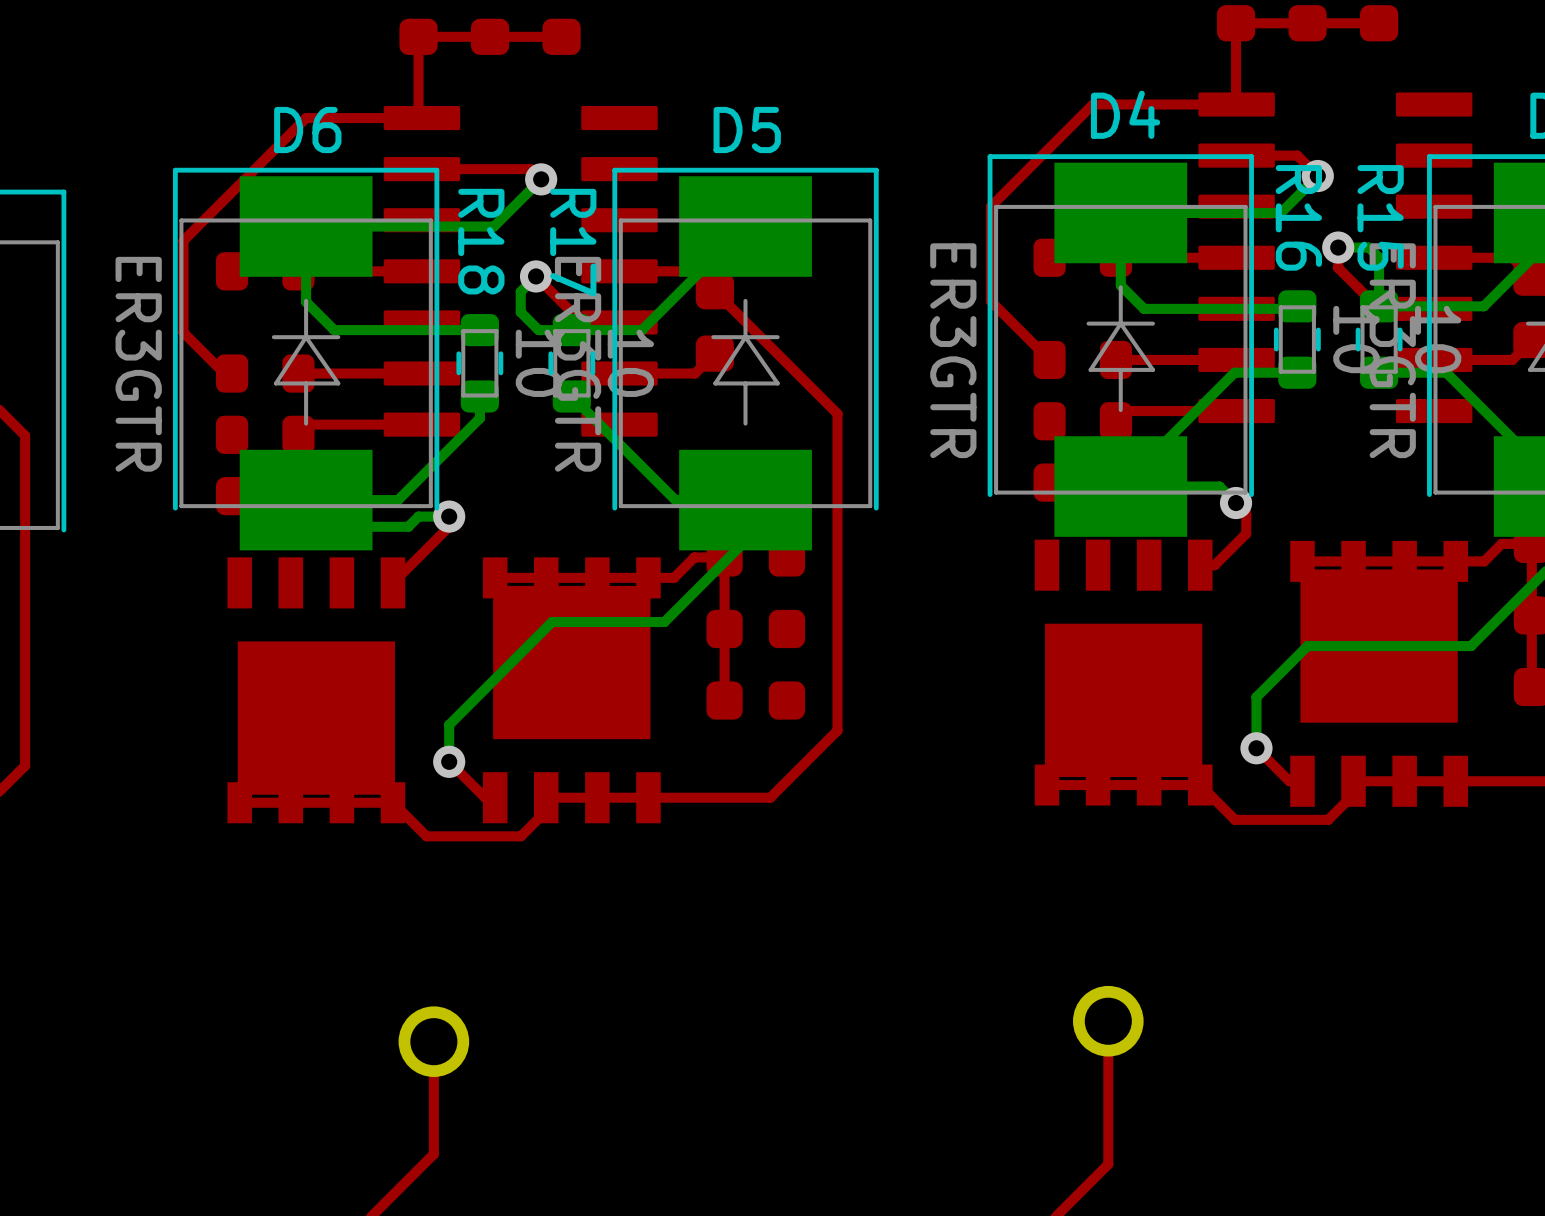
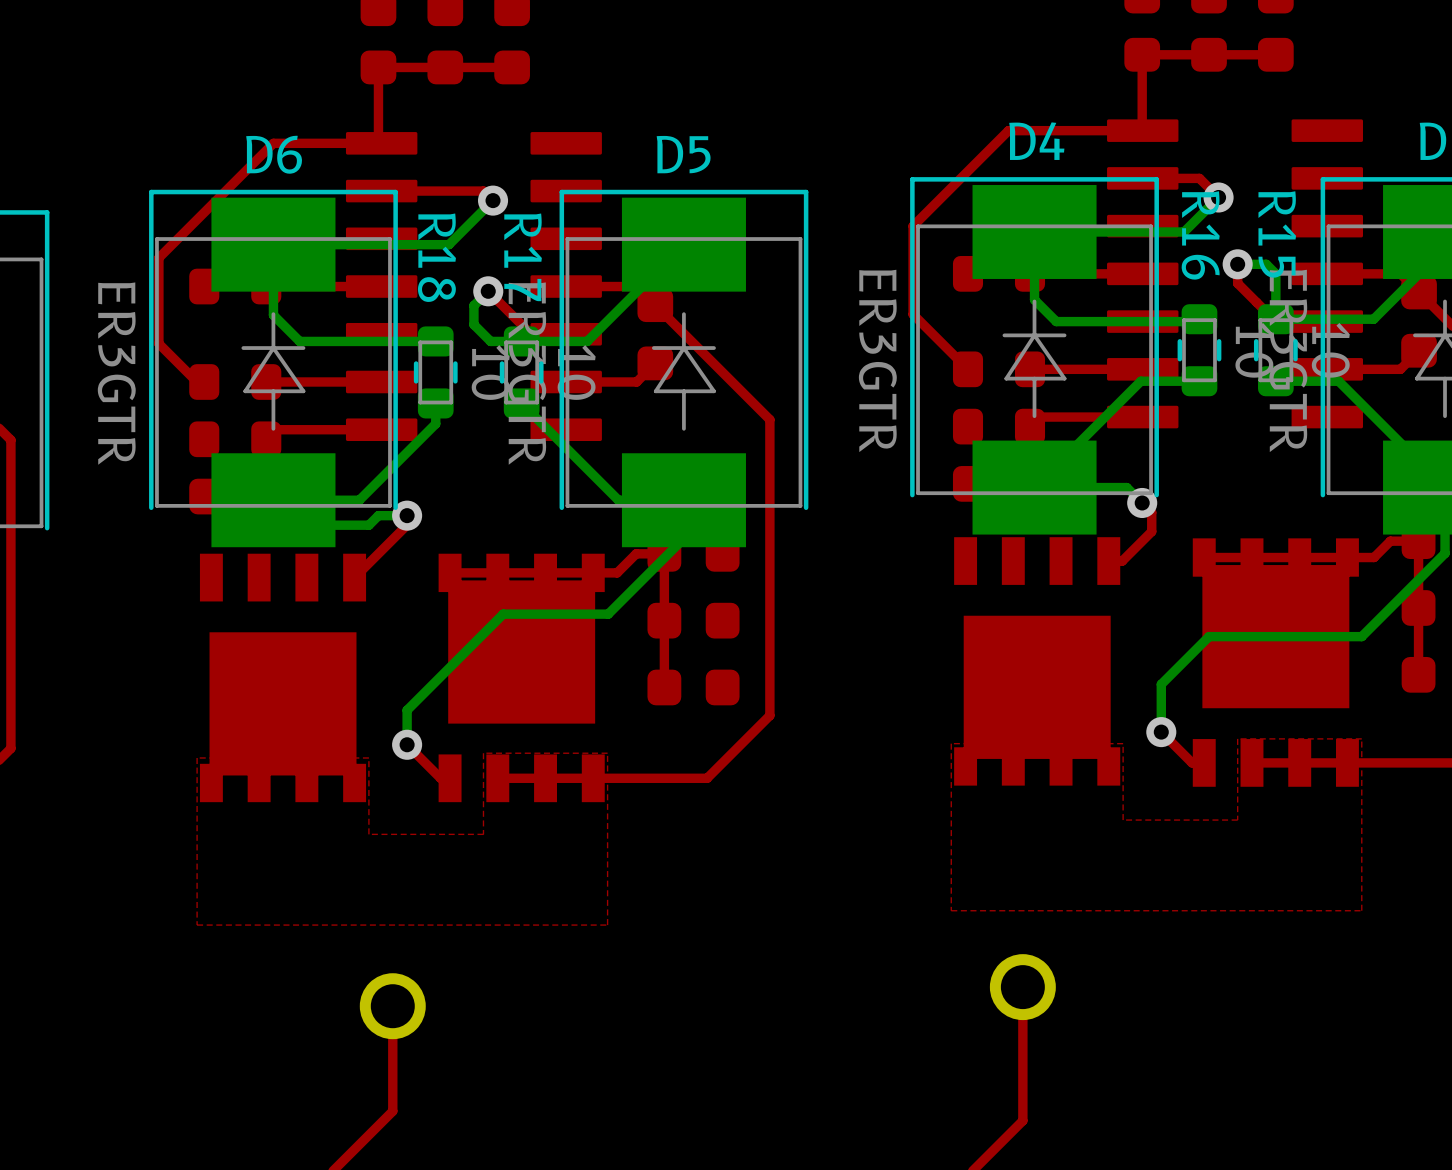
top zone outline: none -> (1361, 738) (1361, 910) (951, 910) (951, 743) (1123, 743) (1123, 820) (1237, 820) (1237, 738) (1361, 738)
top zone outline: none -> (607, 753) (607, 925) (197, 925) (197, 757) (368, 757) (368, 834) (483, 834) (483, 753) (607, 753)
top track: (1046, 785) (1200, 785) (1235, 819) (1328, 819) (1353, 794) -> none
top track: (239, 802) (392, 802) (426, 836) (520, 836) (546, 810) -> none

